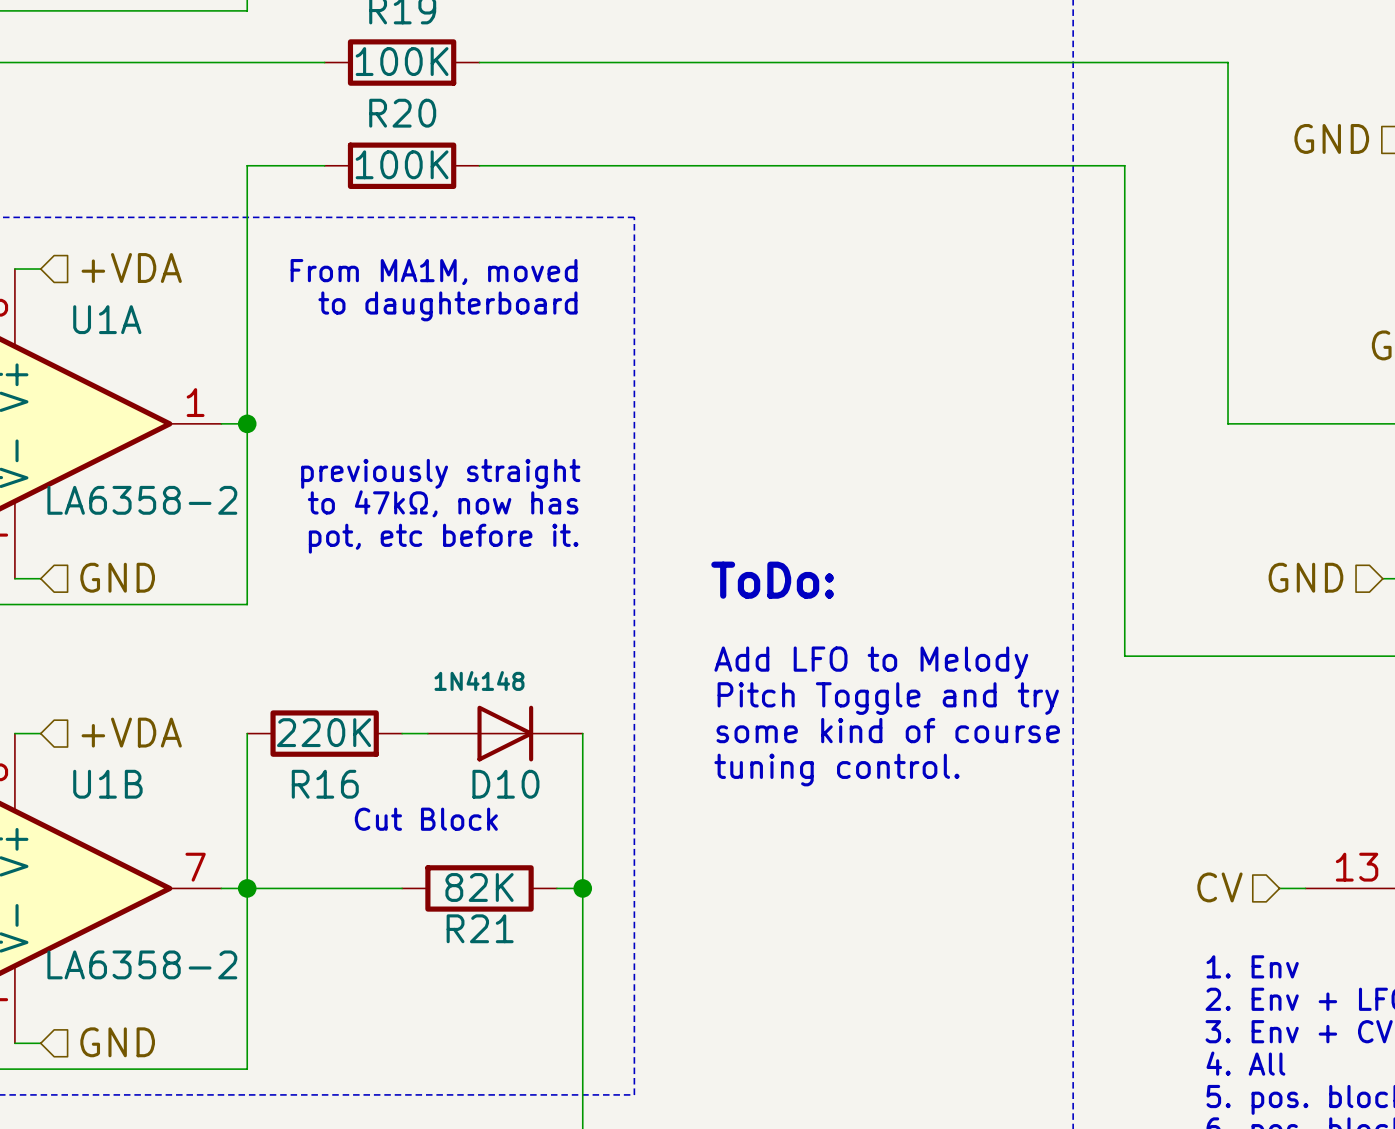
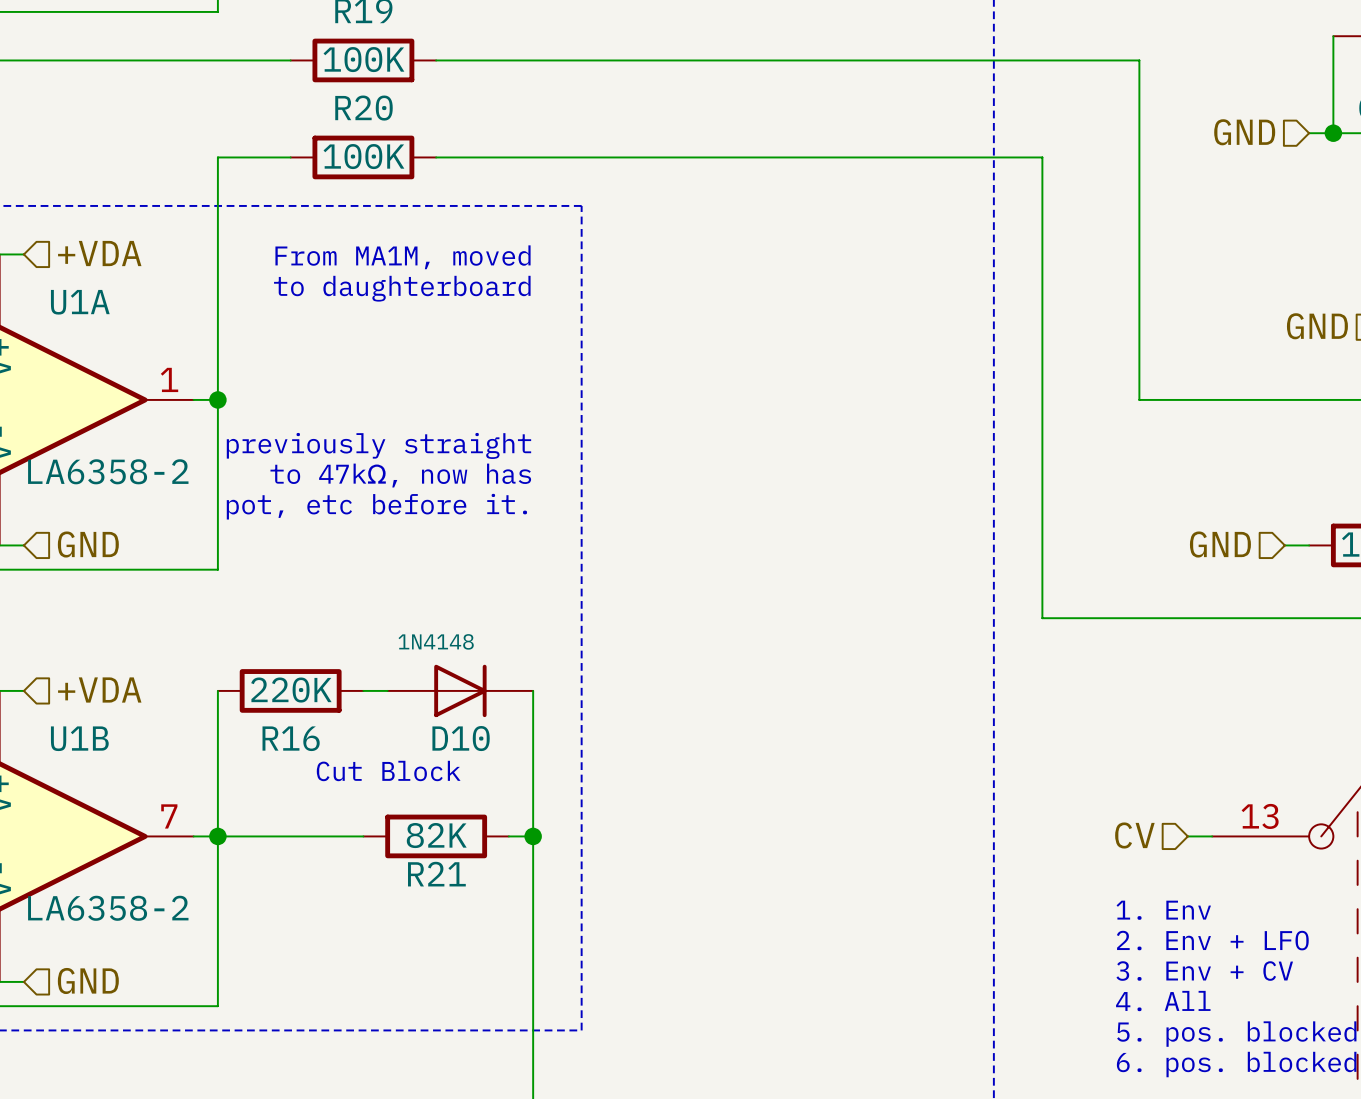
text: ToDo: (772, 580) -> none
text: Add LFO to Melody (871, 662) -> none
text: Pitch Toggle and try (888, 698) -> none
text: some kind of course (888, 730) -> none
text: tuning control. (836, 770) -> none

